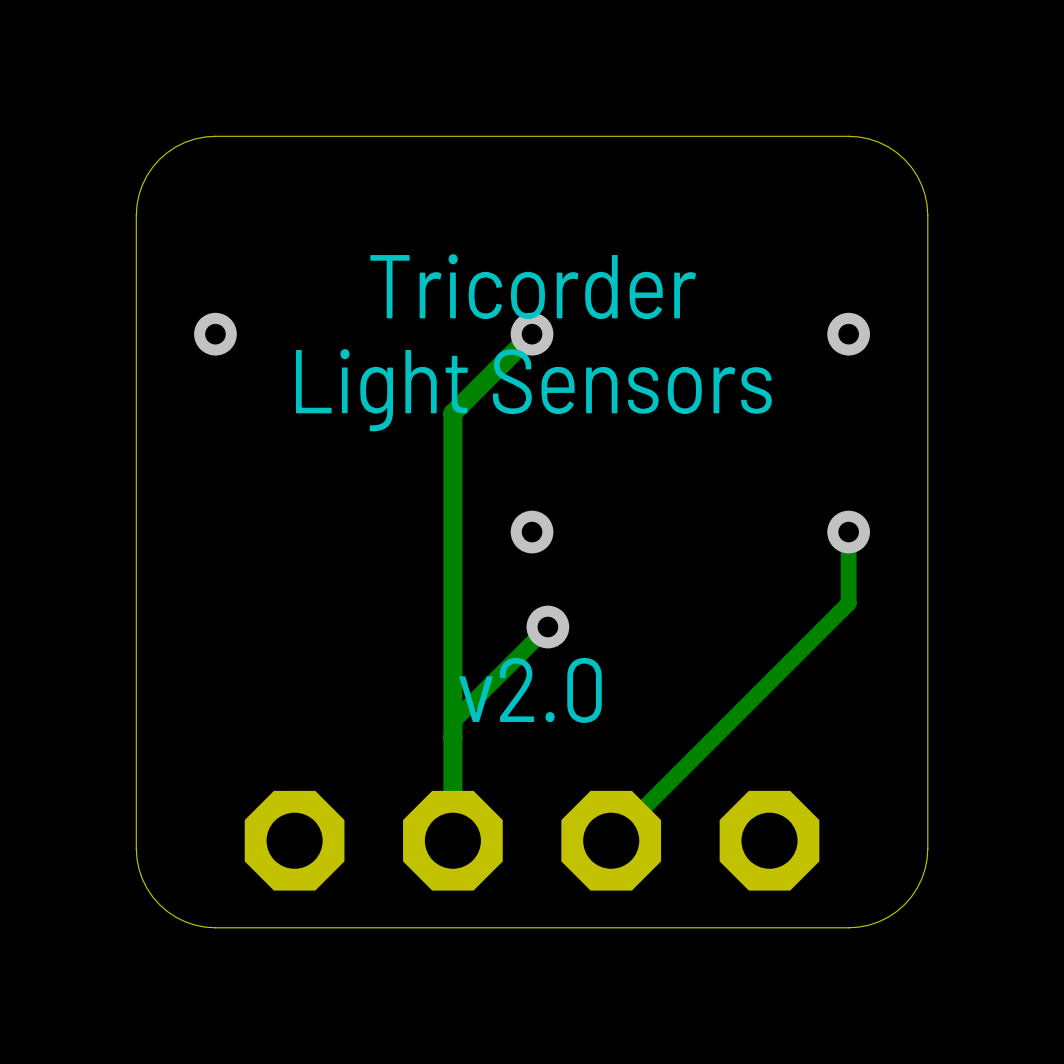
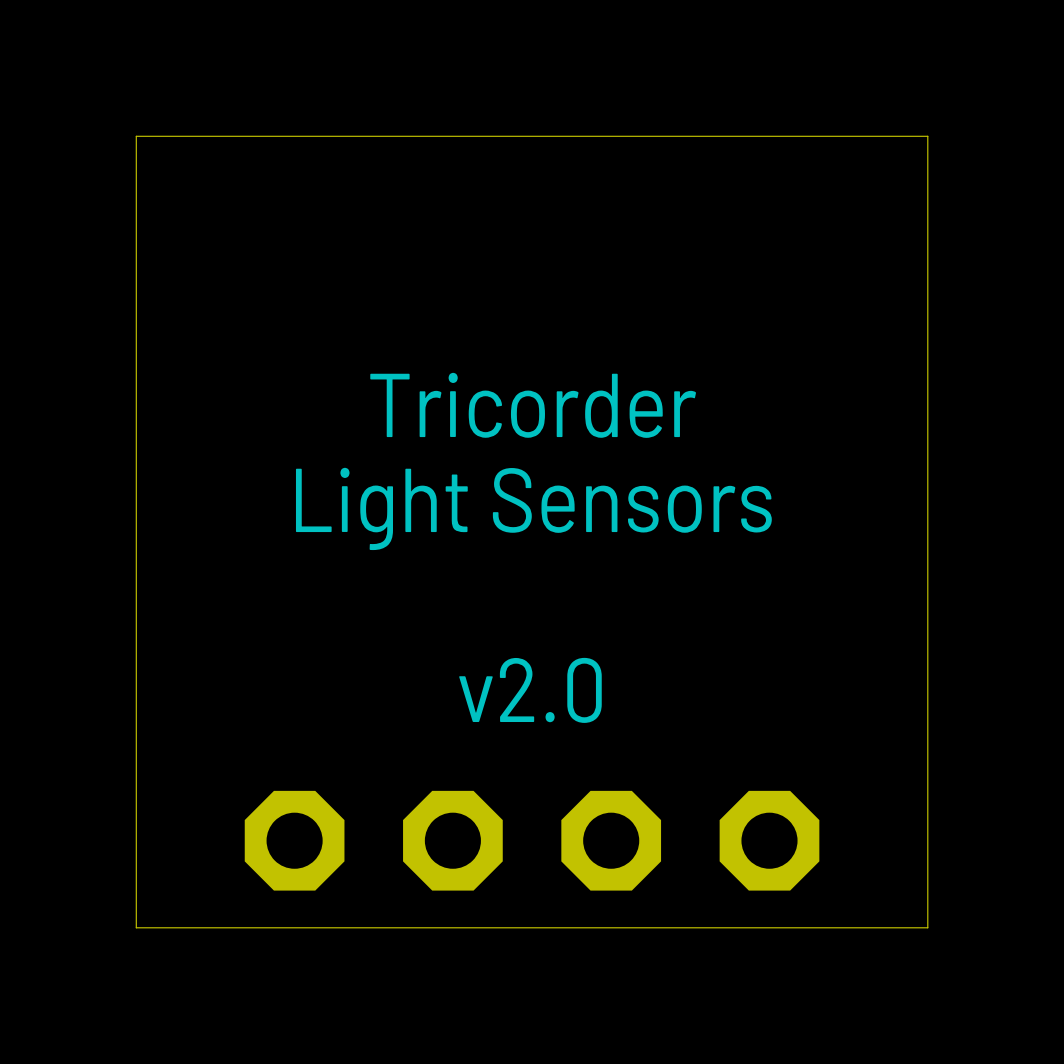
board edge: (215, 136) (185, 142) (159, 159) (142, 185) (136, 215) -> (215, 136) (136, 136) (136, 215)
board edge: (848, 136) (878, 142) (904, 159) (921, 185) (927, 215) -> (848, 136) (927, 136) (927, 215)
text position: Tricorder (533, 286) -> Tricorder (533, 405)
via: (215, 334) -> none
track: (532, 334) (452, 413) (452, 840) -> none
via: (532, 334) -> none
via: (848, 334) -> none
text position: Light Sensors (533, 390) -> Light Sensors (533, 508)
via: (532, 532) -> none
track: (848, 532) (848, 603) (611, 840) -> none
via: (848, 532) -> none
track: (547, 627) (452, 722) (452, 737) -> none
via: (547, 627) -> none
board edge: (136, 848) (142, 878) (159, 904) (185, 921) (215, 927) -> (136, 848) (136, 927) (215, 927)
board edge: (927, 848) (921, 878) (904, 904) (878, 921) (848, 927) -> (927, 848) (927, 927) (848, 927)

